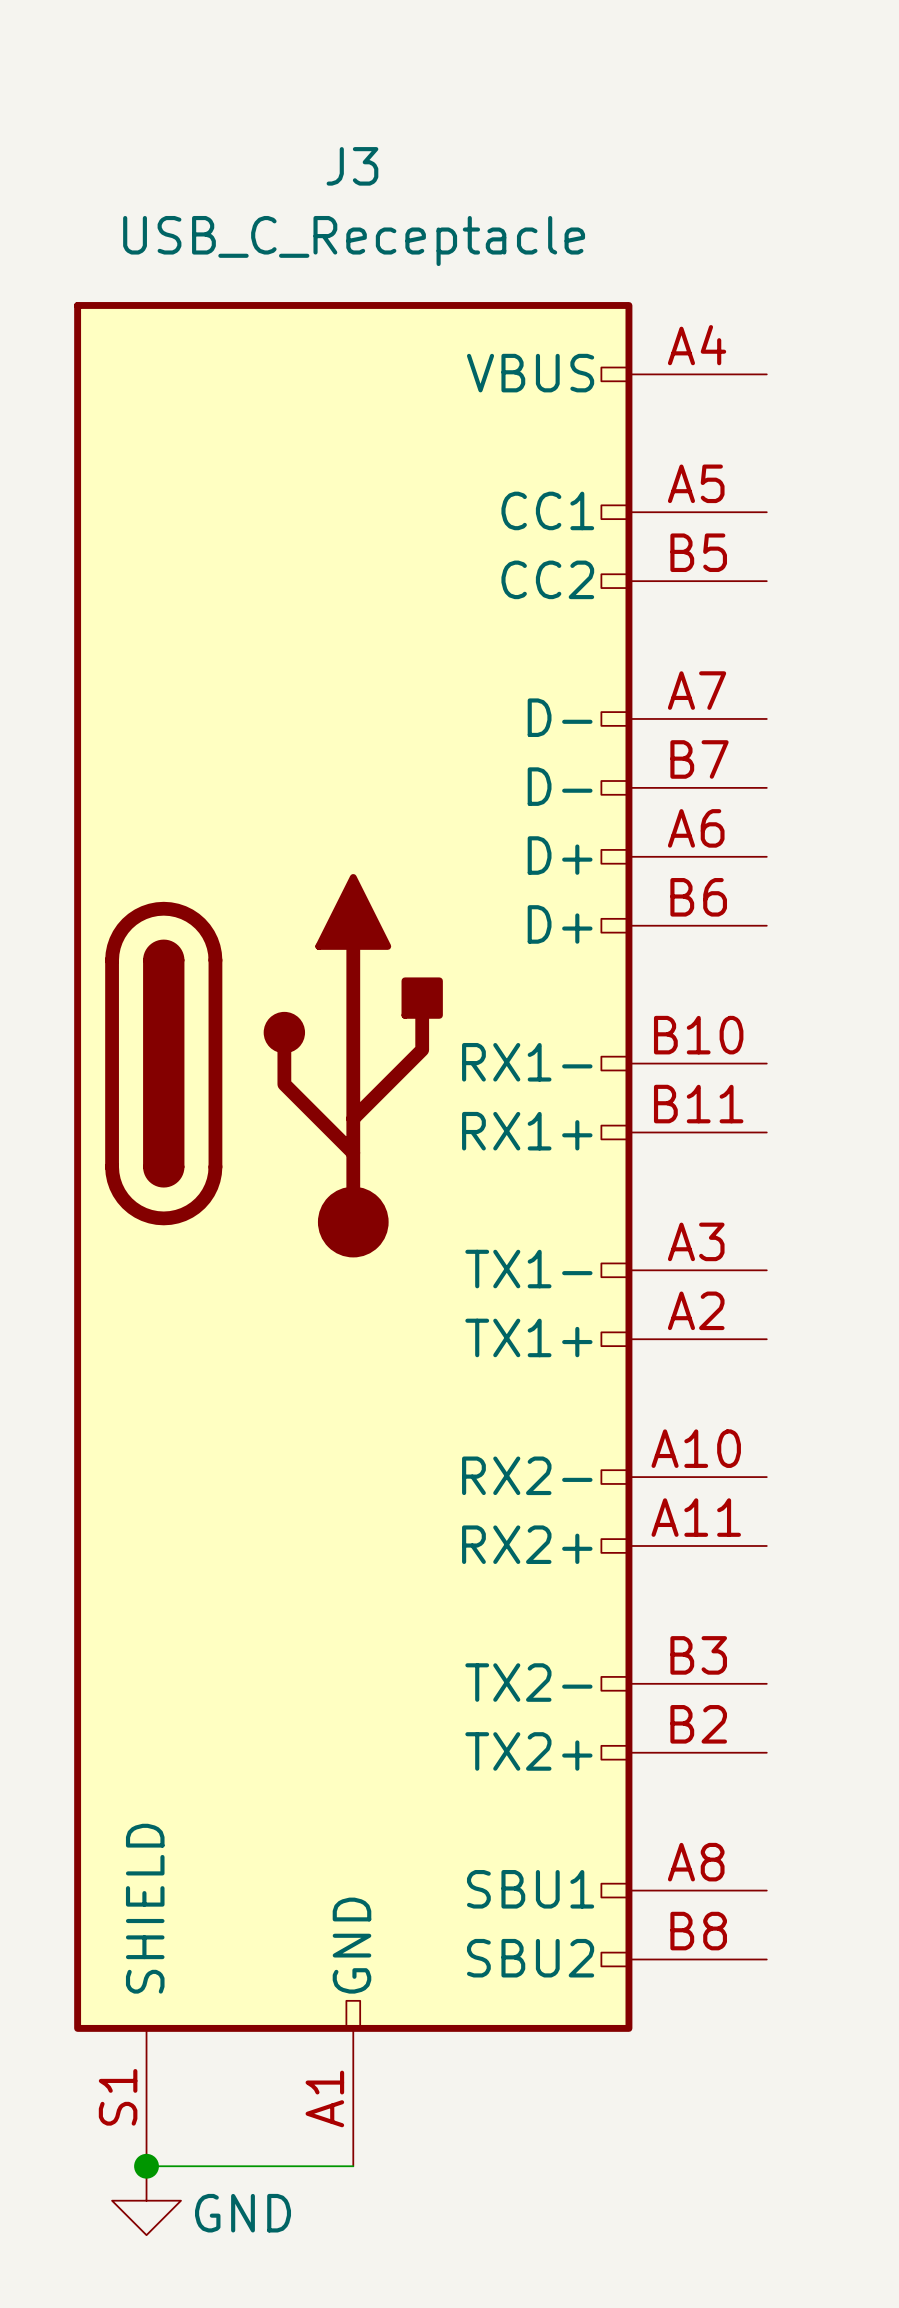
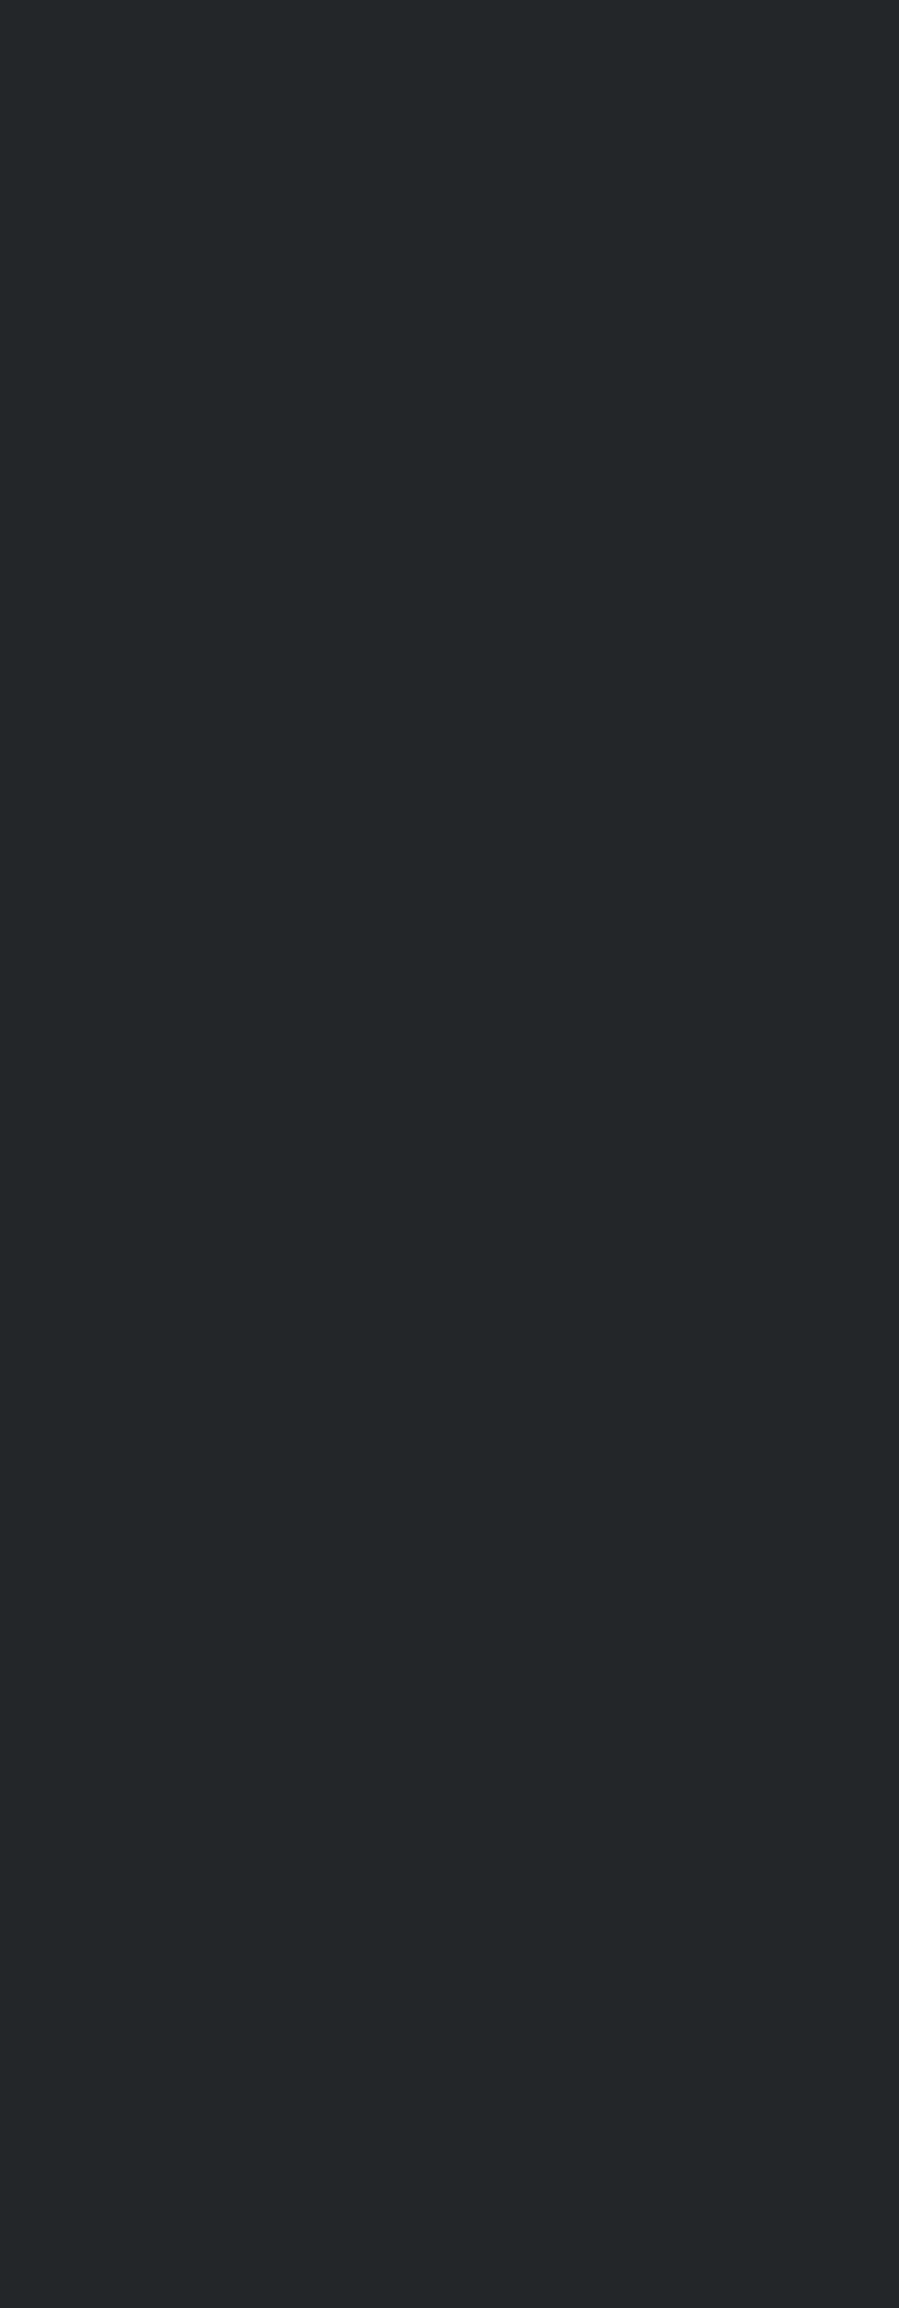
J3: USB_C_Receptacle (420, 1234) -> none
wire: (146, 2166) (353, 2166) -> none
junction: (146, 2166) -> none
power symbol: GND (146, 2200) -> none

